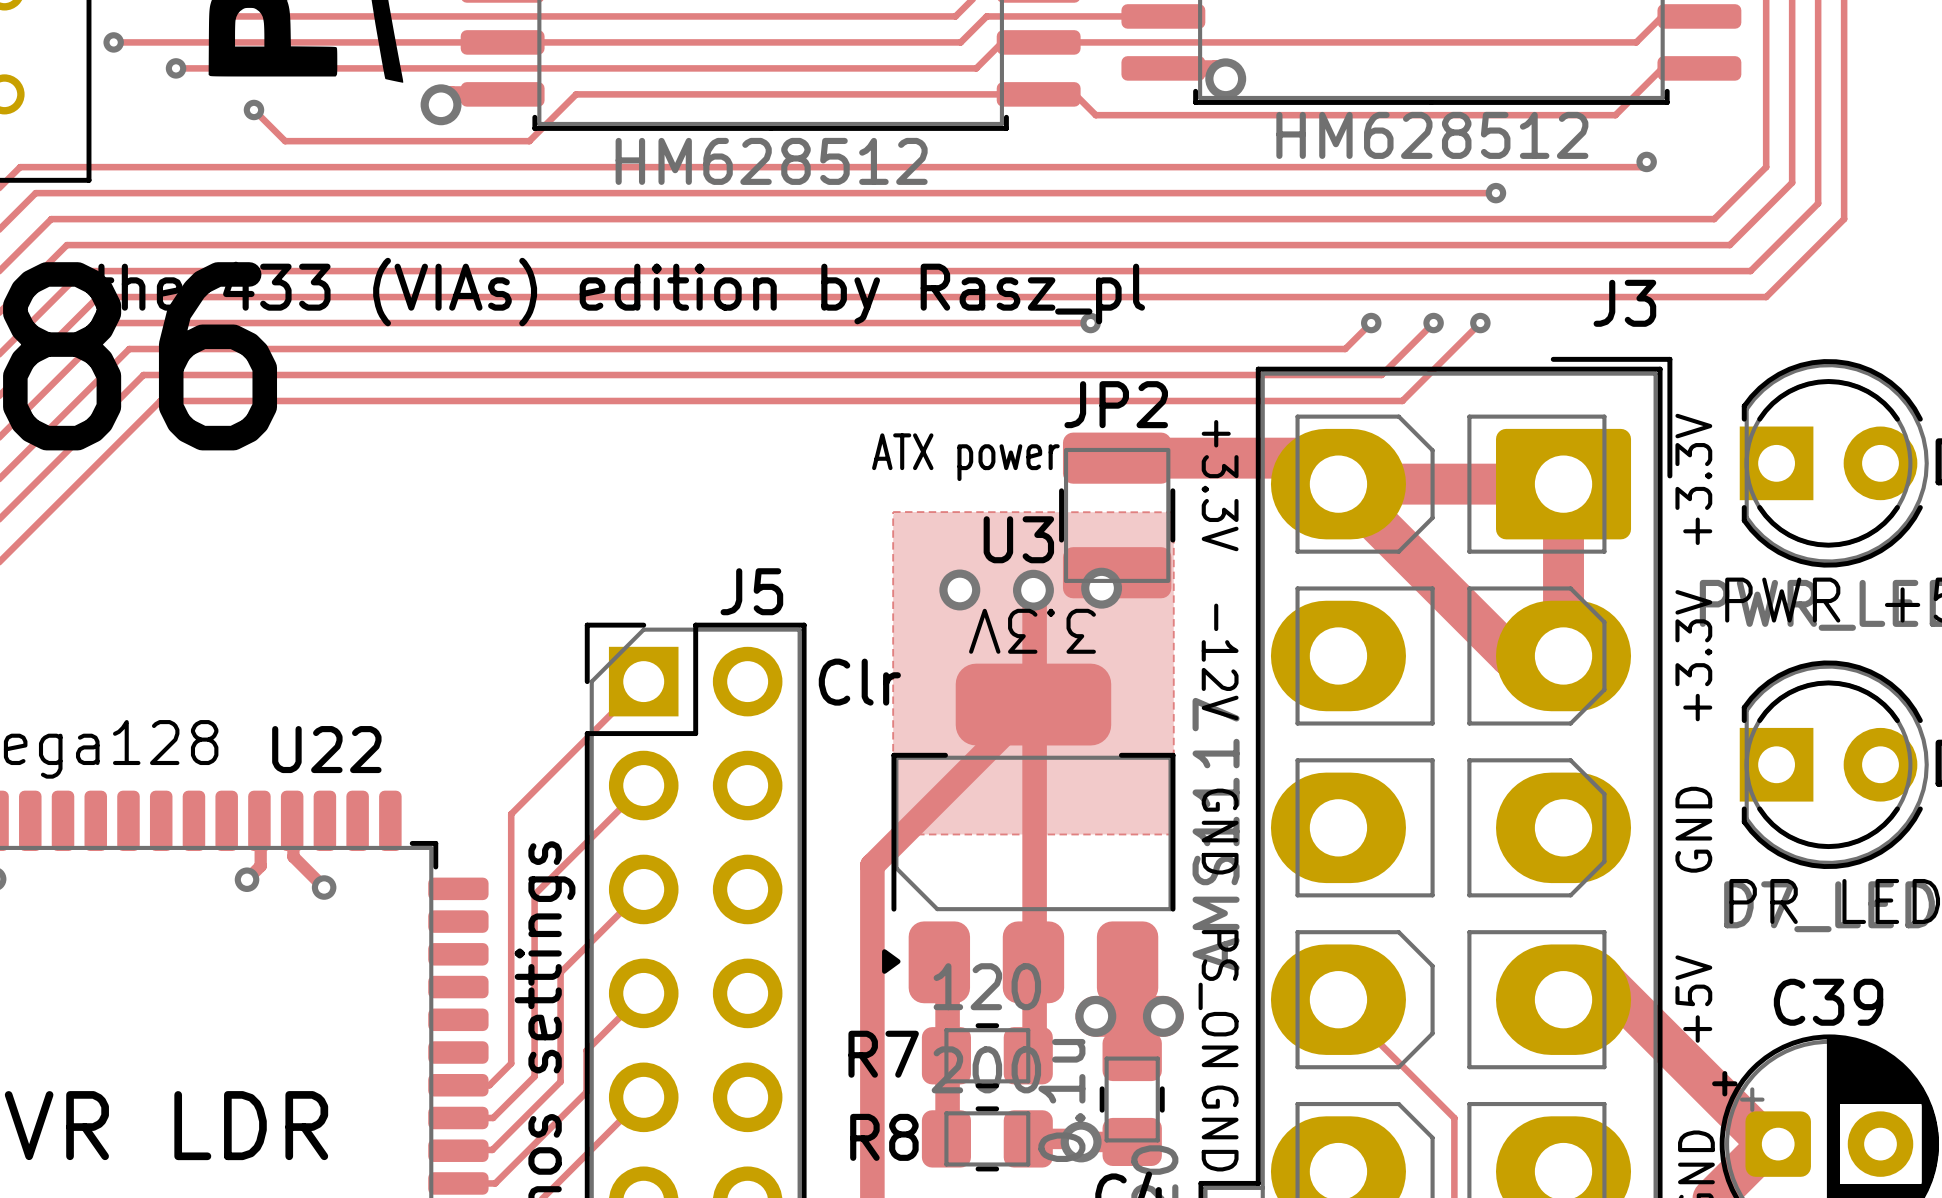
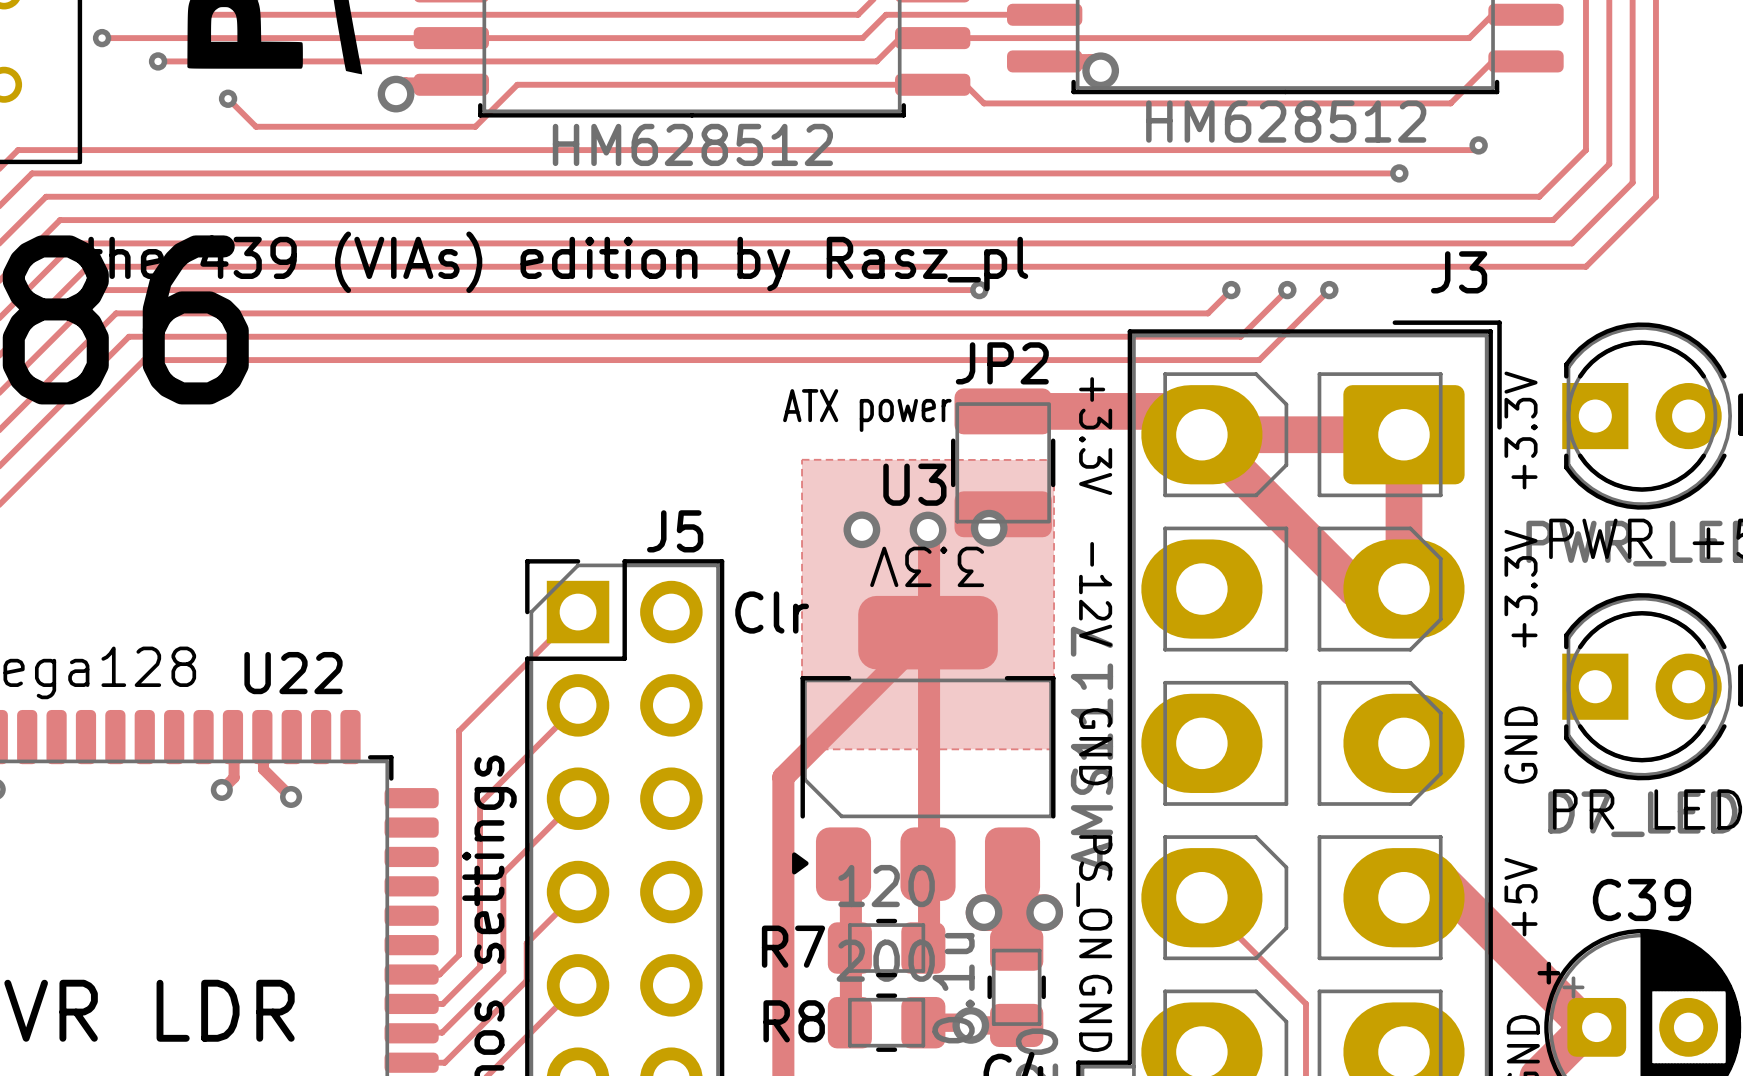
track: none -> (1343, 173) (1399, 173)
via position: (1495, 193) -> (1399, 173)
text: the 433 (VIAs) edition by Rasz_pl (618, 292) -> the 439 (VIAs) edition by Rasz_pl (555, 262)

